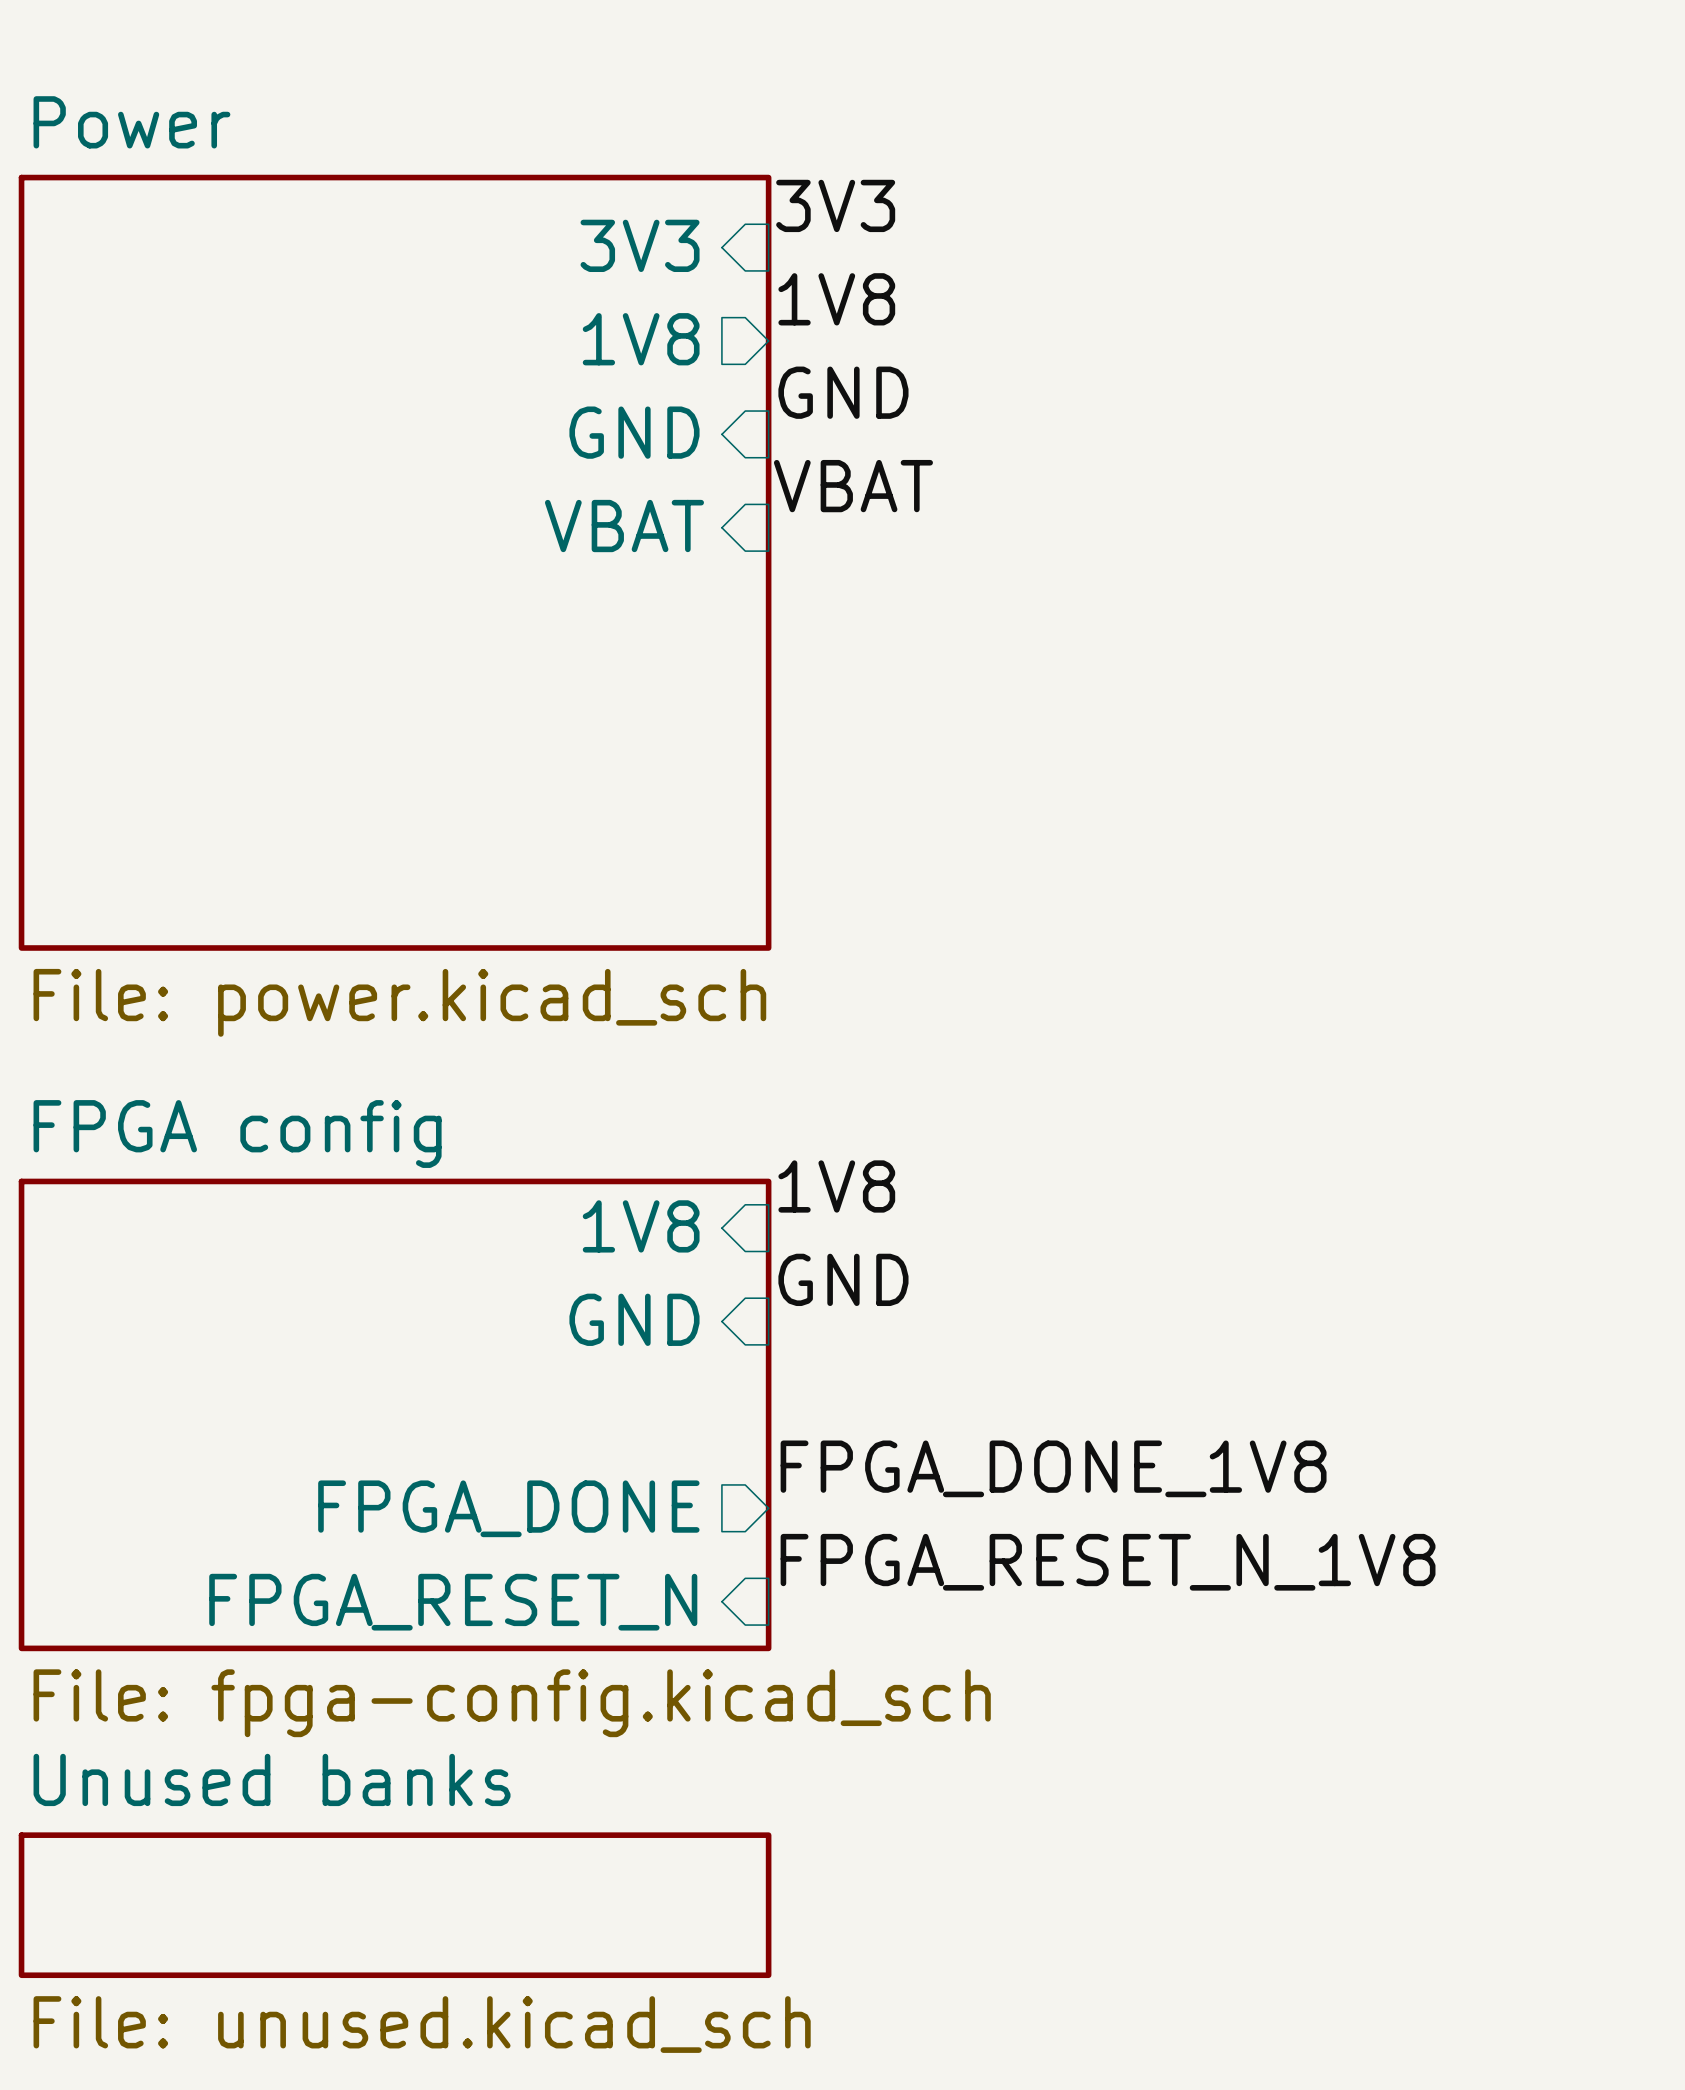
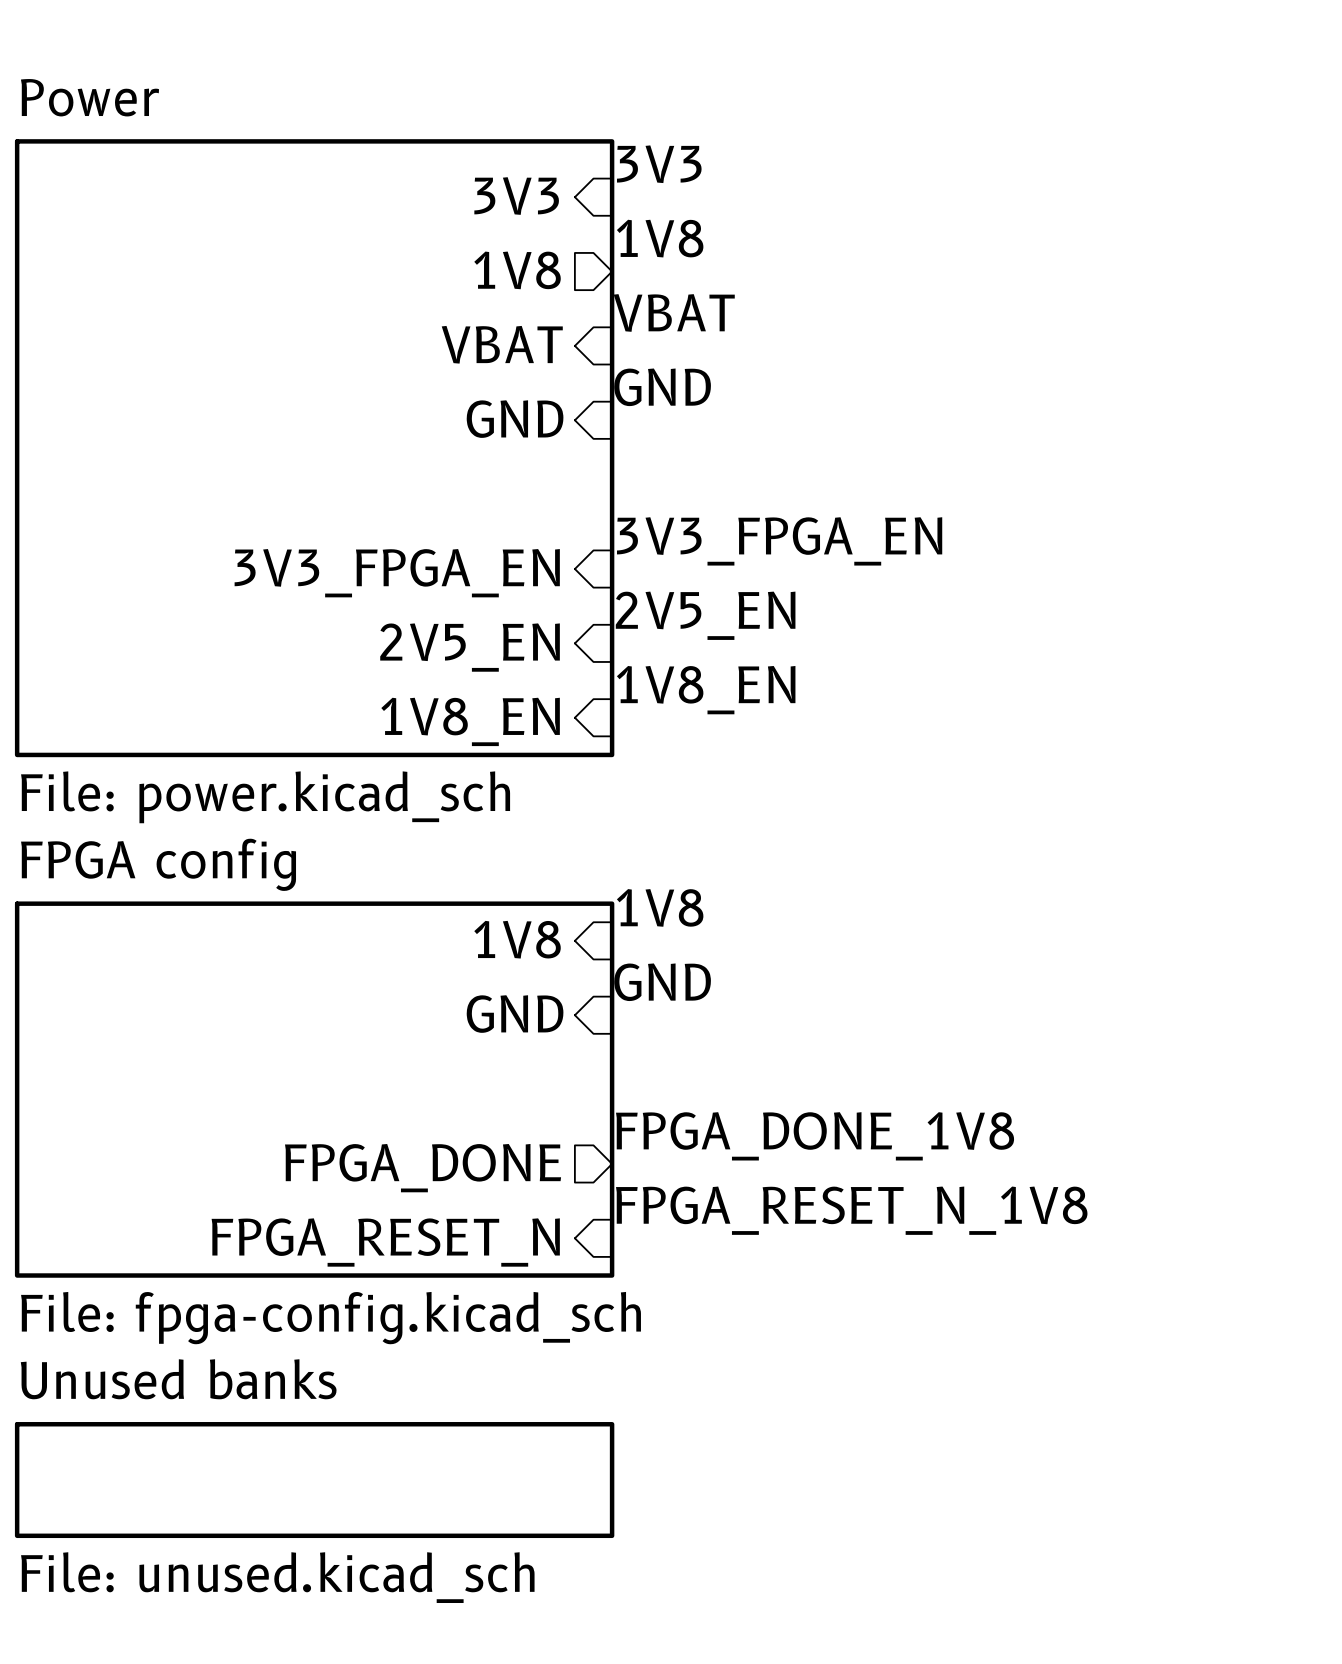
label: GND (843, 392) -> VBAT (674, 312)
sheet pin: GND (634, 432) -> VBAT (502, 344)
label: VBAT (853, 486) -> GND (662, 387)
sheet pin: VBAT (624, 526) -> GND (515, 419)
label: none -> 3V3_FPGA_EN (779, 541)
sheet pin: none -> 3V3_FPGA_EN (397, 573)
label: none -> 2V5_EN (705, 615)
sheet pin: none -> 2V5_EN (470, 647)
label: none -> 1V8_EN (706, 690)
sheet pin: none -> 1V8_EN (470, 721)
label position: 1V8 (836, 1186) -> 1V8 (660, 907)
sheet pin position: 1V8 (641, 1226) -> 1V8 (517, 939)
label position: GND (843, 1279) -> GND (662, 982)
sheet pin position: GND (634, 1319) -> GND (515, 1014)
sheet FPGA config position: (395, 1414) -> (314, 1089)
label position: FPGA_DONE_1V8 (1053, 1468) -> FPGA_DONE_1V8 (815, 1136)
sheet pin position: FPGA_DONE (508, 1508) -> FPGA_DONE (423, 1168)
label position: FPGA_RESET_N_1V8 (1108, 1562) -> FPGA_RESET_N_1V8 (851, 1210)
sheet pin position: FPGA_RESET_N (453, 1602) -> FPGA_RESET_N (385, 1242)
sheet Unused banks position: (395, 1905) -> (314, 1480)

